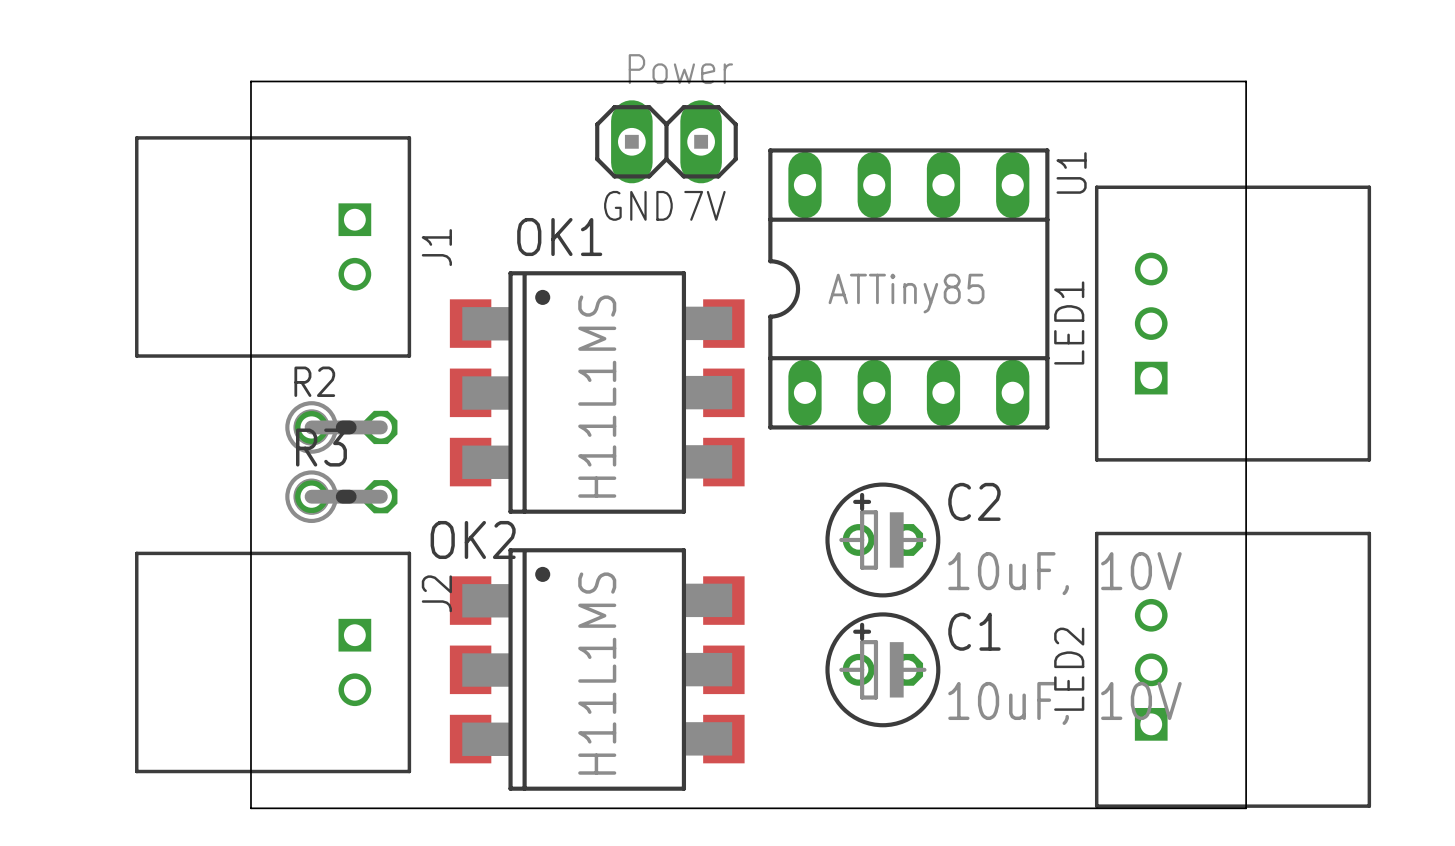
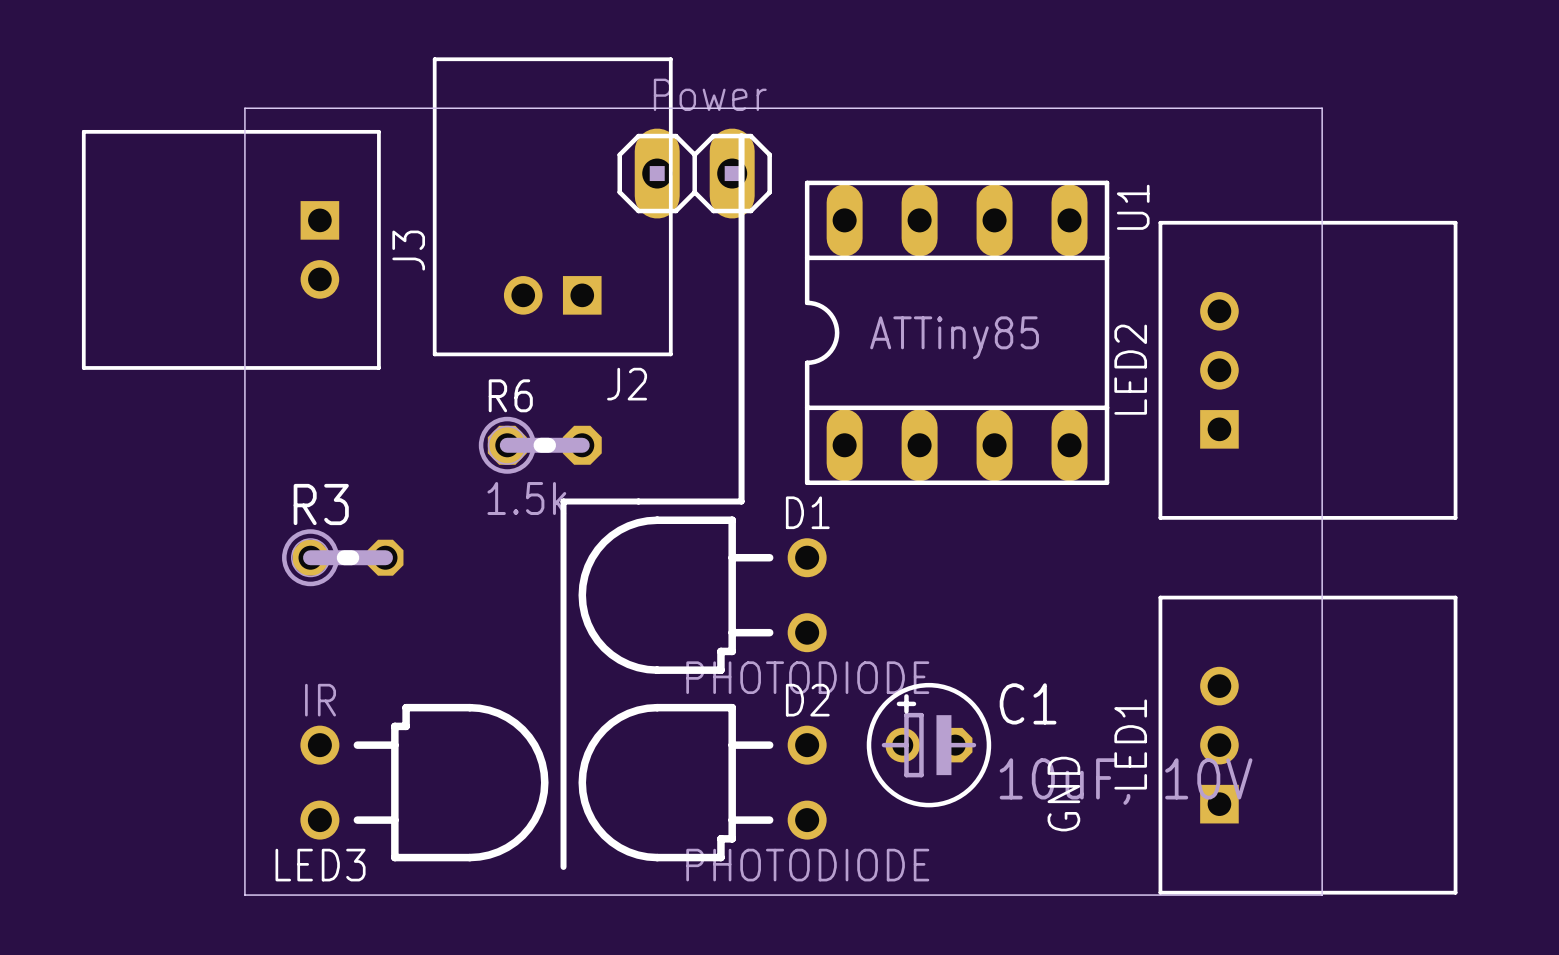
line: none -> (741, 136) (741, 501) (563, 501) (563, 866)
LED1 footprint: [1094, 185, 1372, 462] -> [1158, 595, 1458, 895]
text rotation: 0° (638, 205) -> 90° counterclockwise (1063, 794)
text position: GND (638, 205) -> GND (1063, 794)
text: 7V (704, 205) -> none
J3: none -> (231, 249)
J1: (273, 246) -> none
R6: none -> 1.5k (540, 445)
OK1: H11L1MS (597, 392) -> none
R2: (341, 427) -> none
D1: none -> PHOTODIODE (702, 595)
LED2 footprint: [1094, 531, 1372, 808] -> [1158, 220, 1458, 520]
C2: 10uF, 10V (882, 539) -> none
J2 footprint: [135, 551, 412, 774] -> [432, 57, 673, 357]
J2 name position: J2 (436, 593) -> J2 (627, 384)
OK2: H11L1MS (597, 669) -> none
LED3: none -> IR (424, 782)
D2: none -> PHOTODIODE (702, 782)

